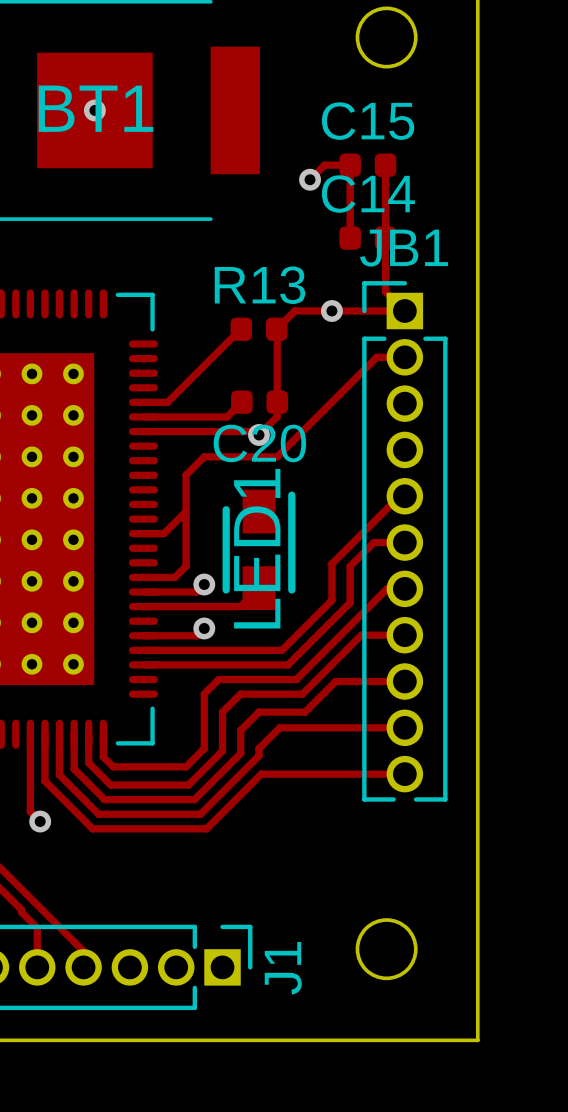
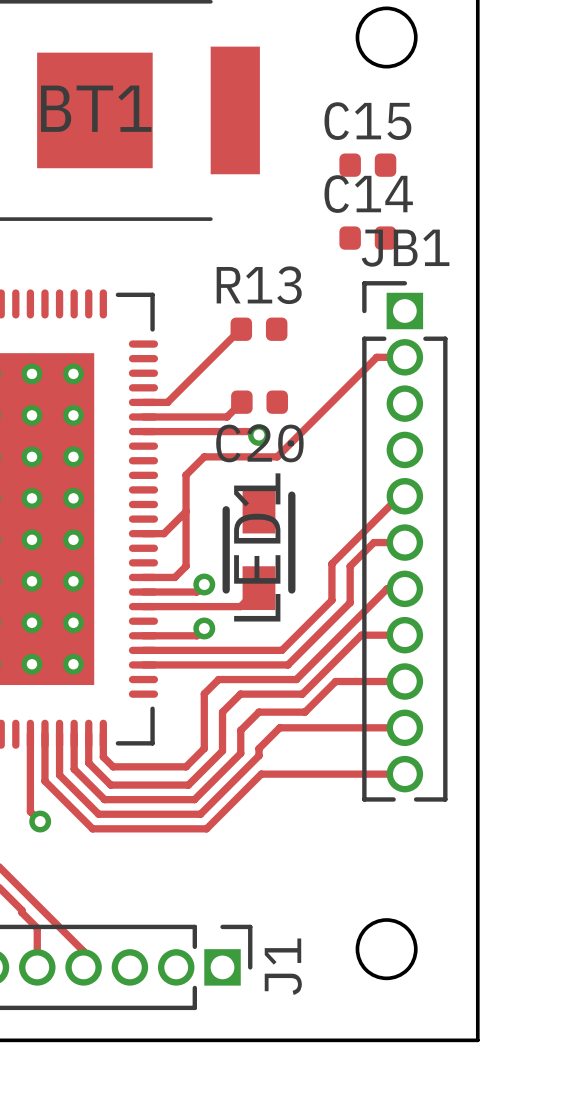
via: (94, 110) -> none
top track: (385, 165) (385, 291) (404, 311) (294, 311) (276, 329) (277, 416) (258, 434) -> none
top track: (310, 179) (324, 165) (350, 165) (350, 238) -> none
via: (310, 179) -> none
via: (331, 311) -> none

